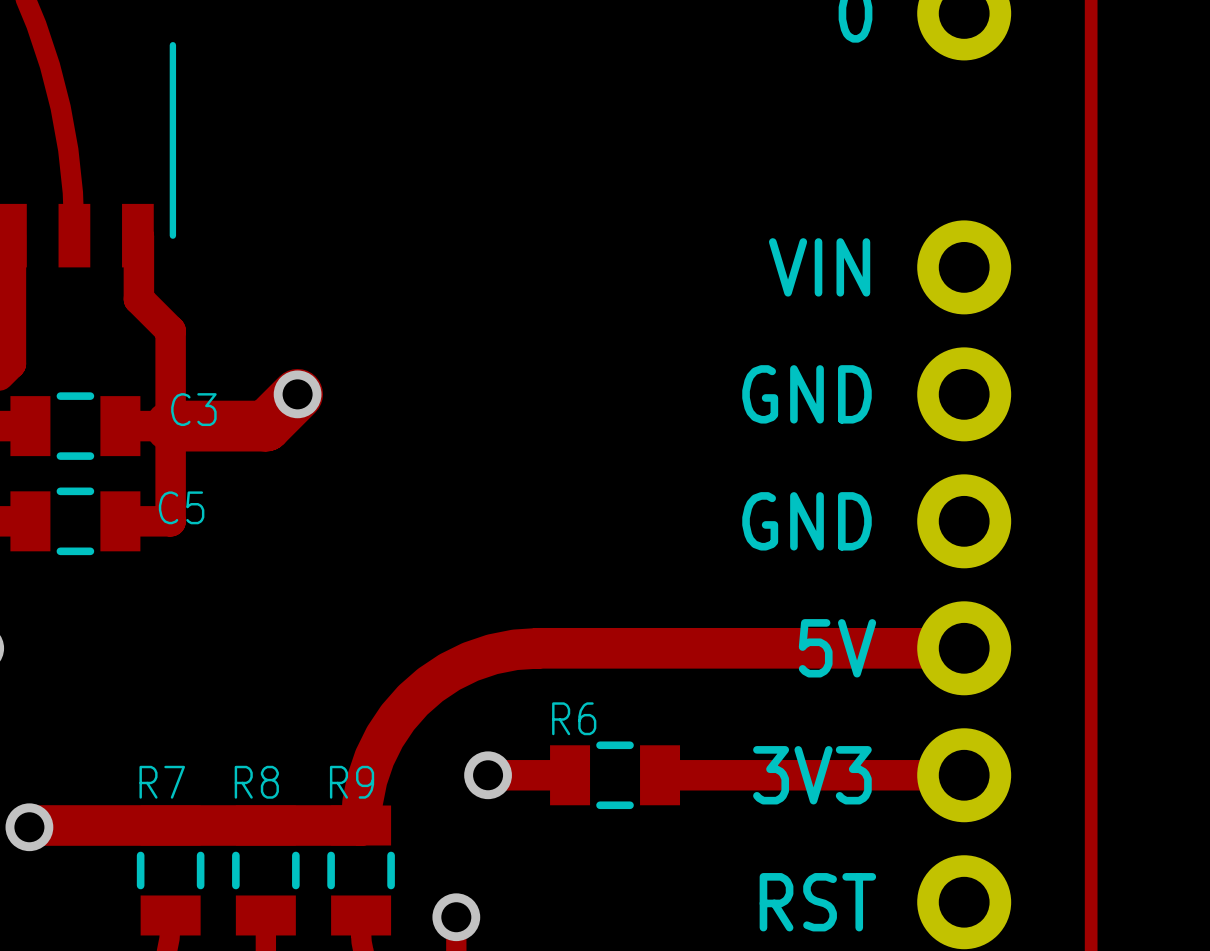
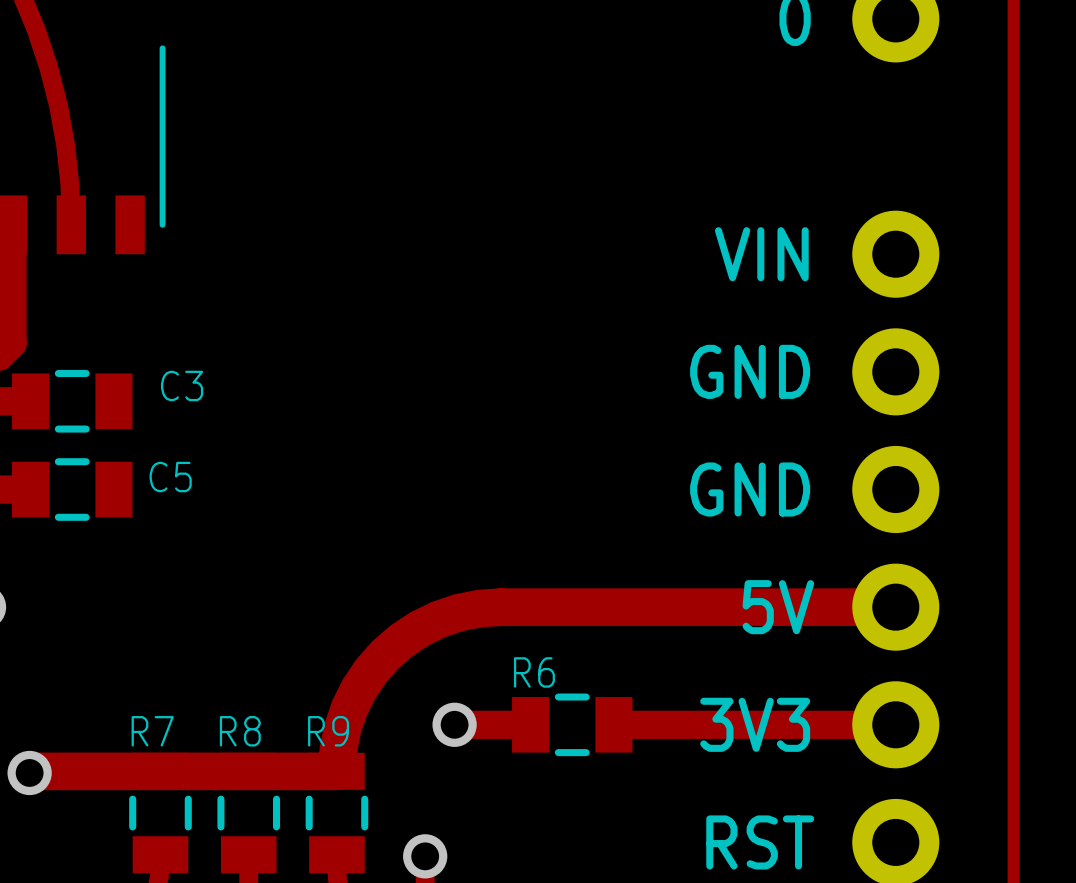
track: (137, 235) (138, 299) (170, 330) (170, 521) (120, 521) -> none
track: (297, 394) (265, 426) (120, 426) -> none
via: (297, 394) -> none

